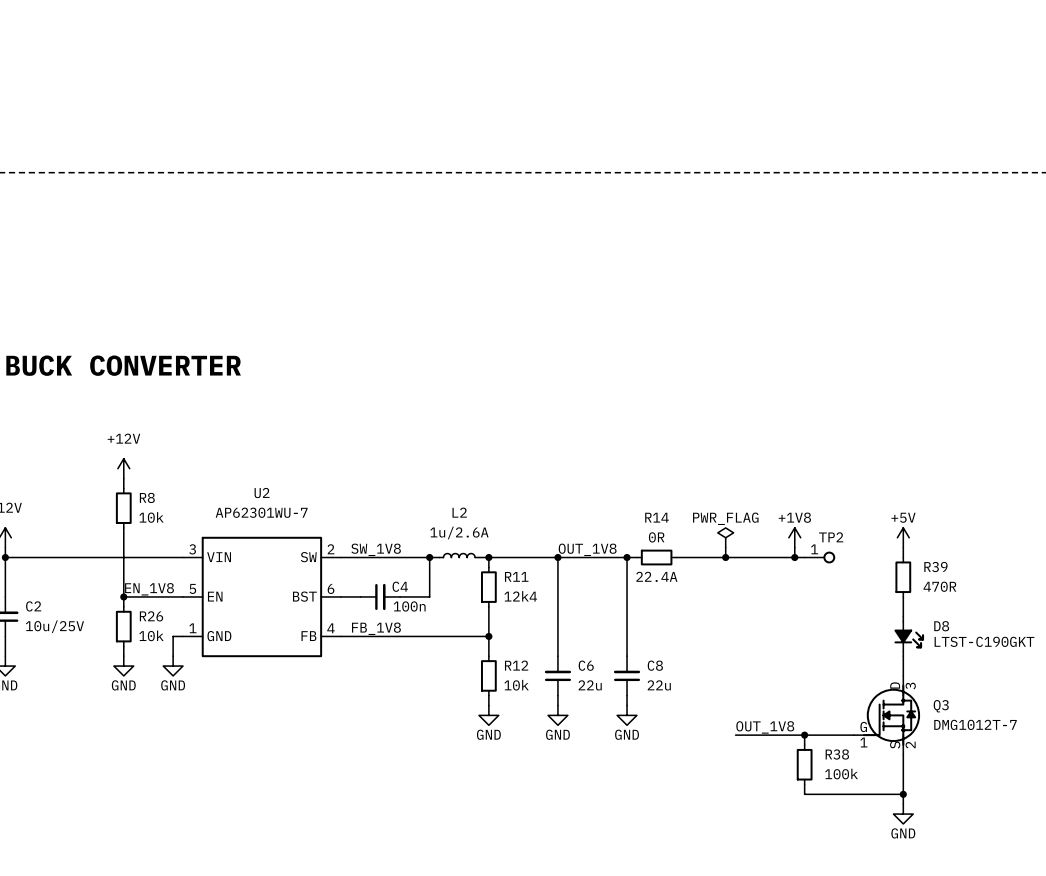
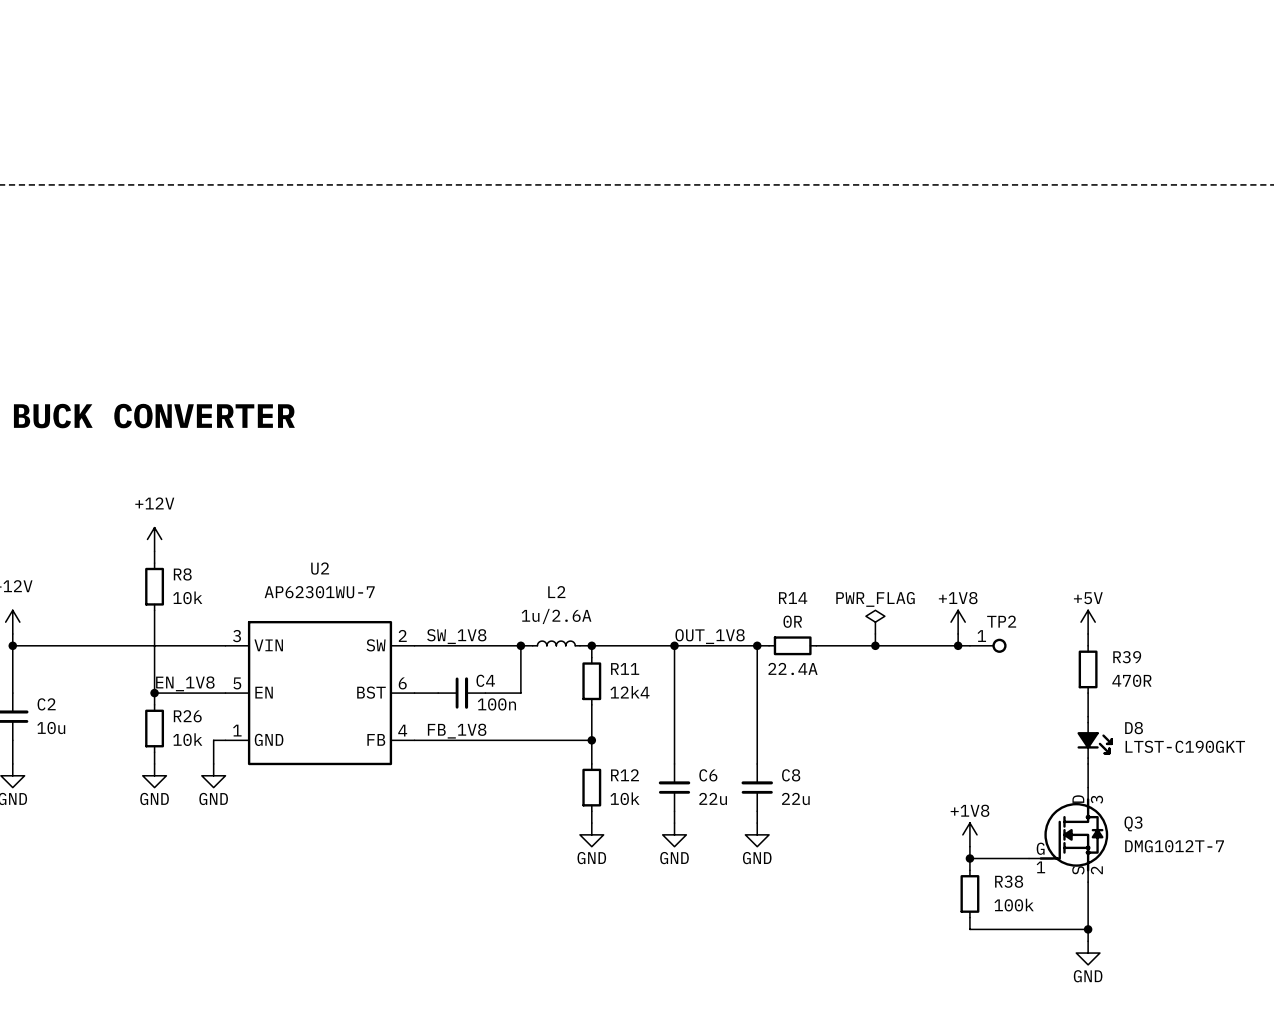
C2 text: 10u/25V (54, 626) -> 10u (51, 728)
power symbol: none -> +1V8 (969, 834)
label: OUT_1V8 (765, 727) -> none
wire: (735, 735) (804, 735) -> (969, 846) (969, 858)

